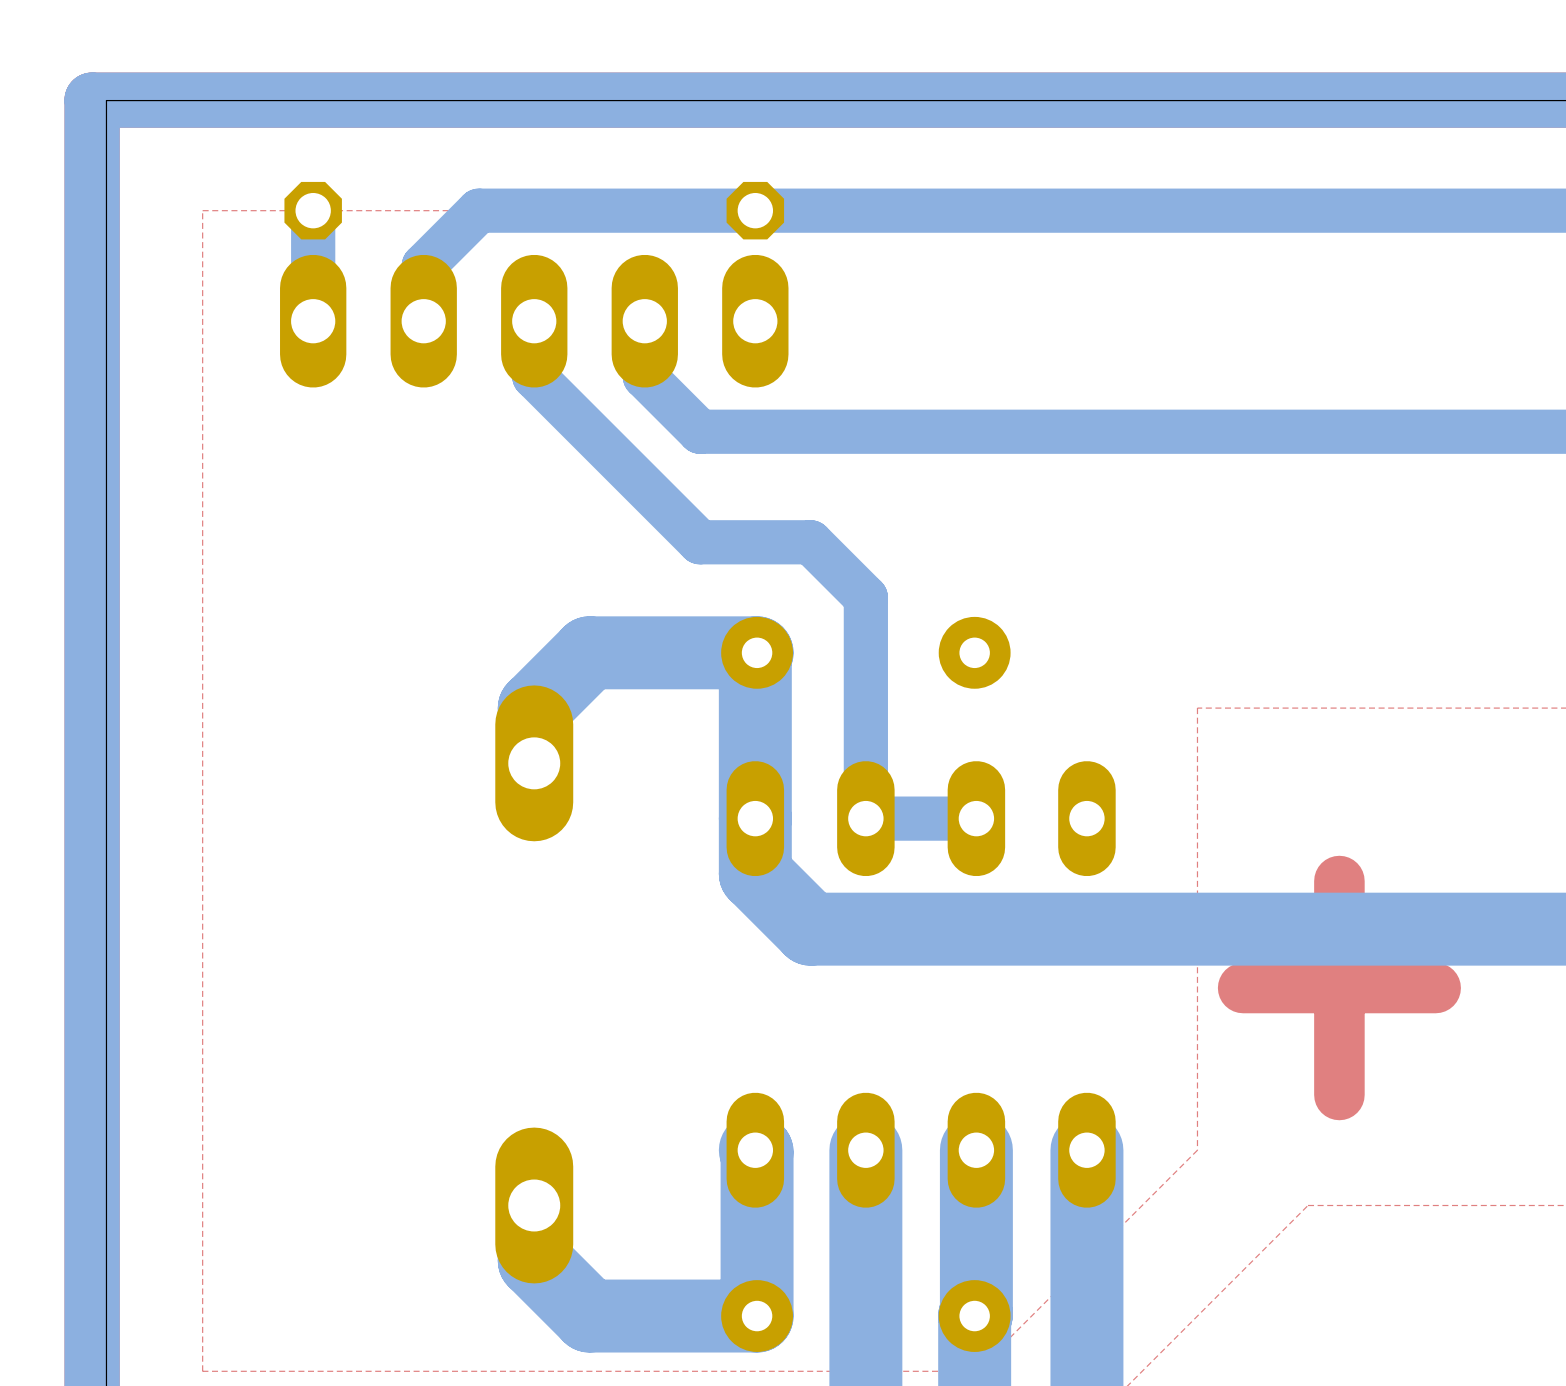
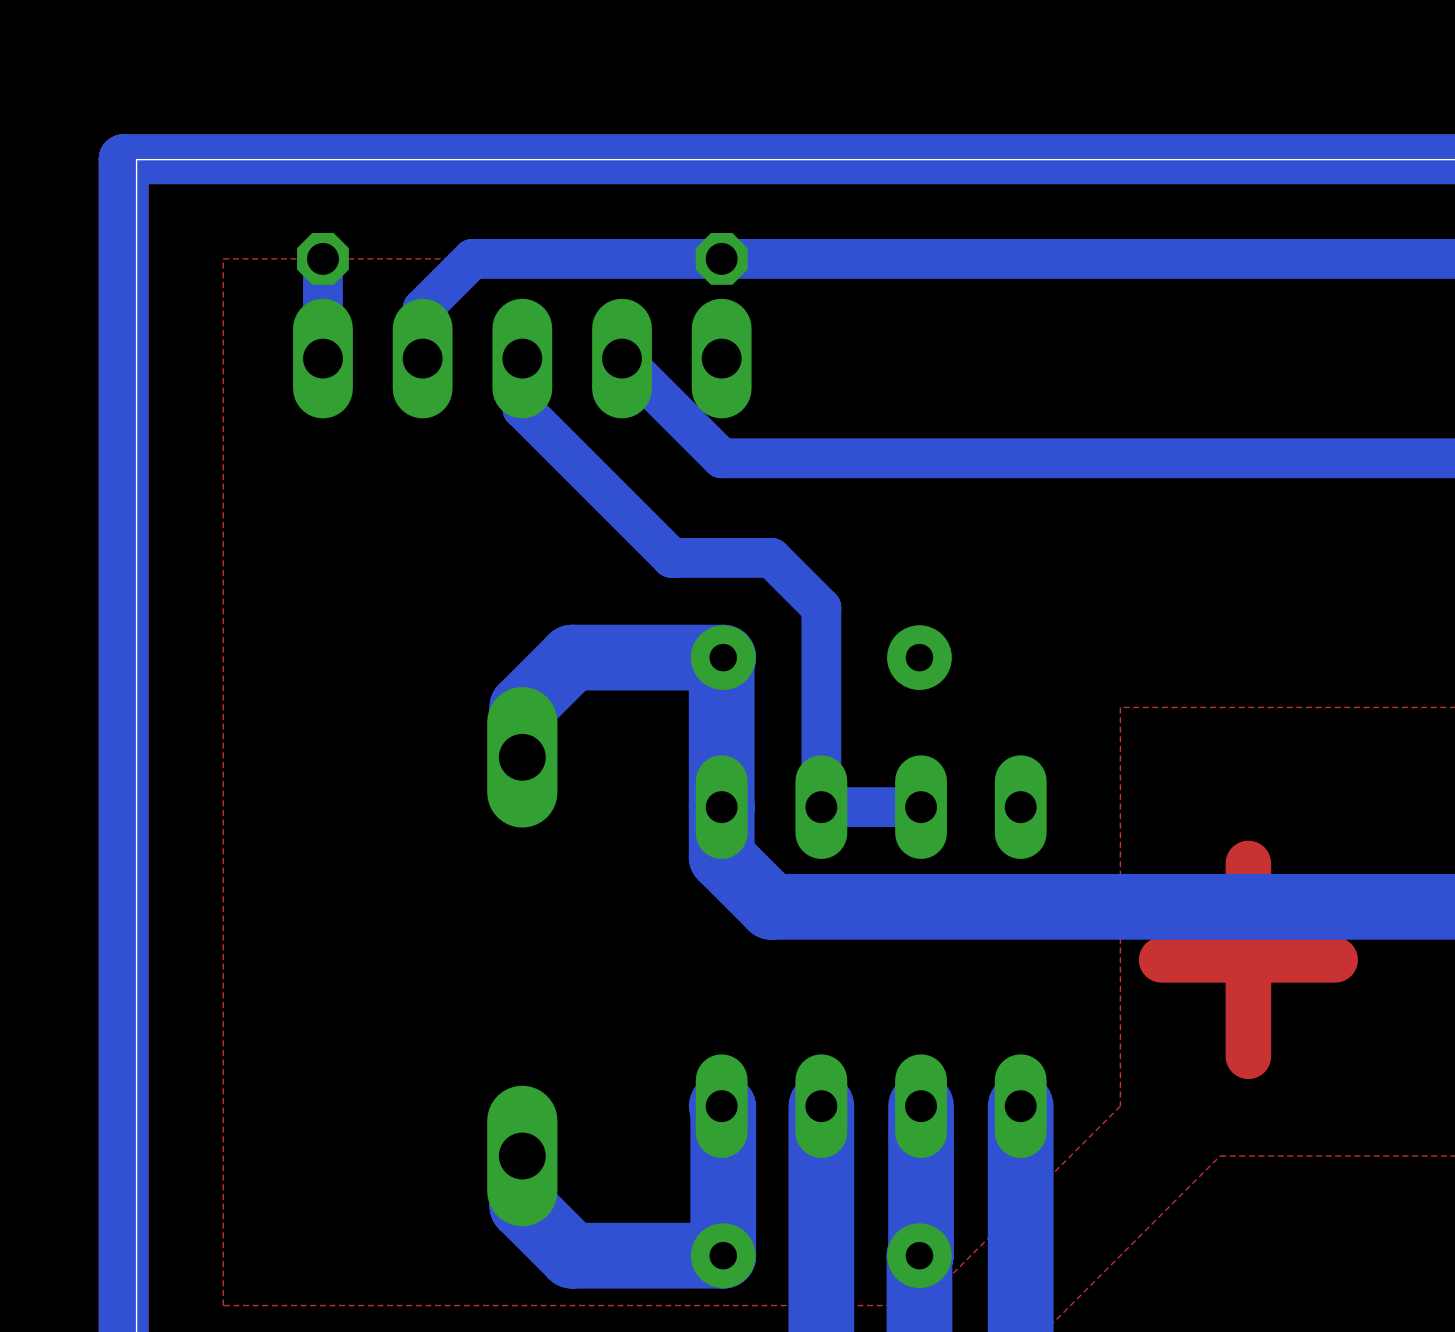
bottom track: (644, 321) (644, 376) (700, 431) (755, 431) -> (622, 358) (721, 458)

